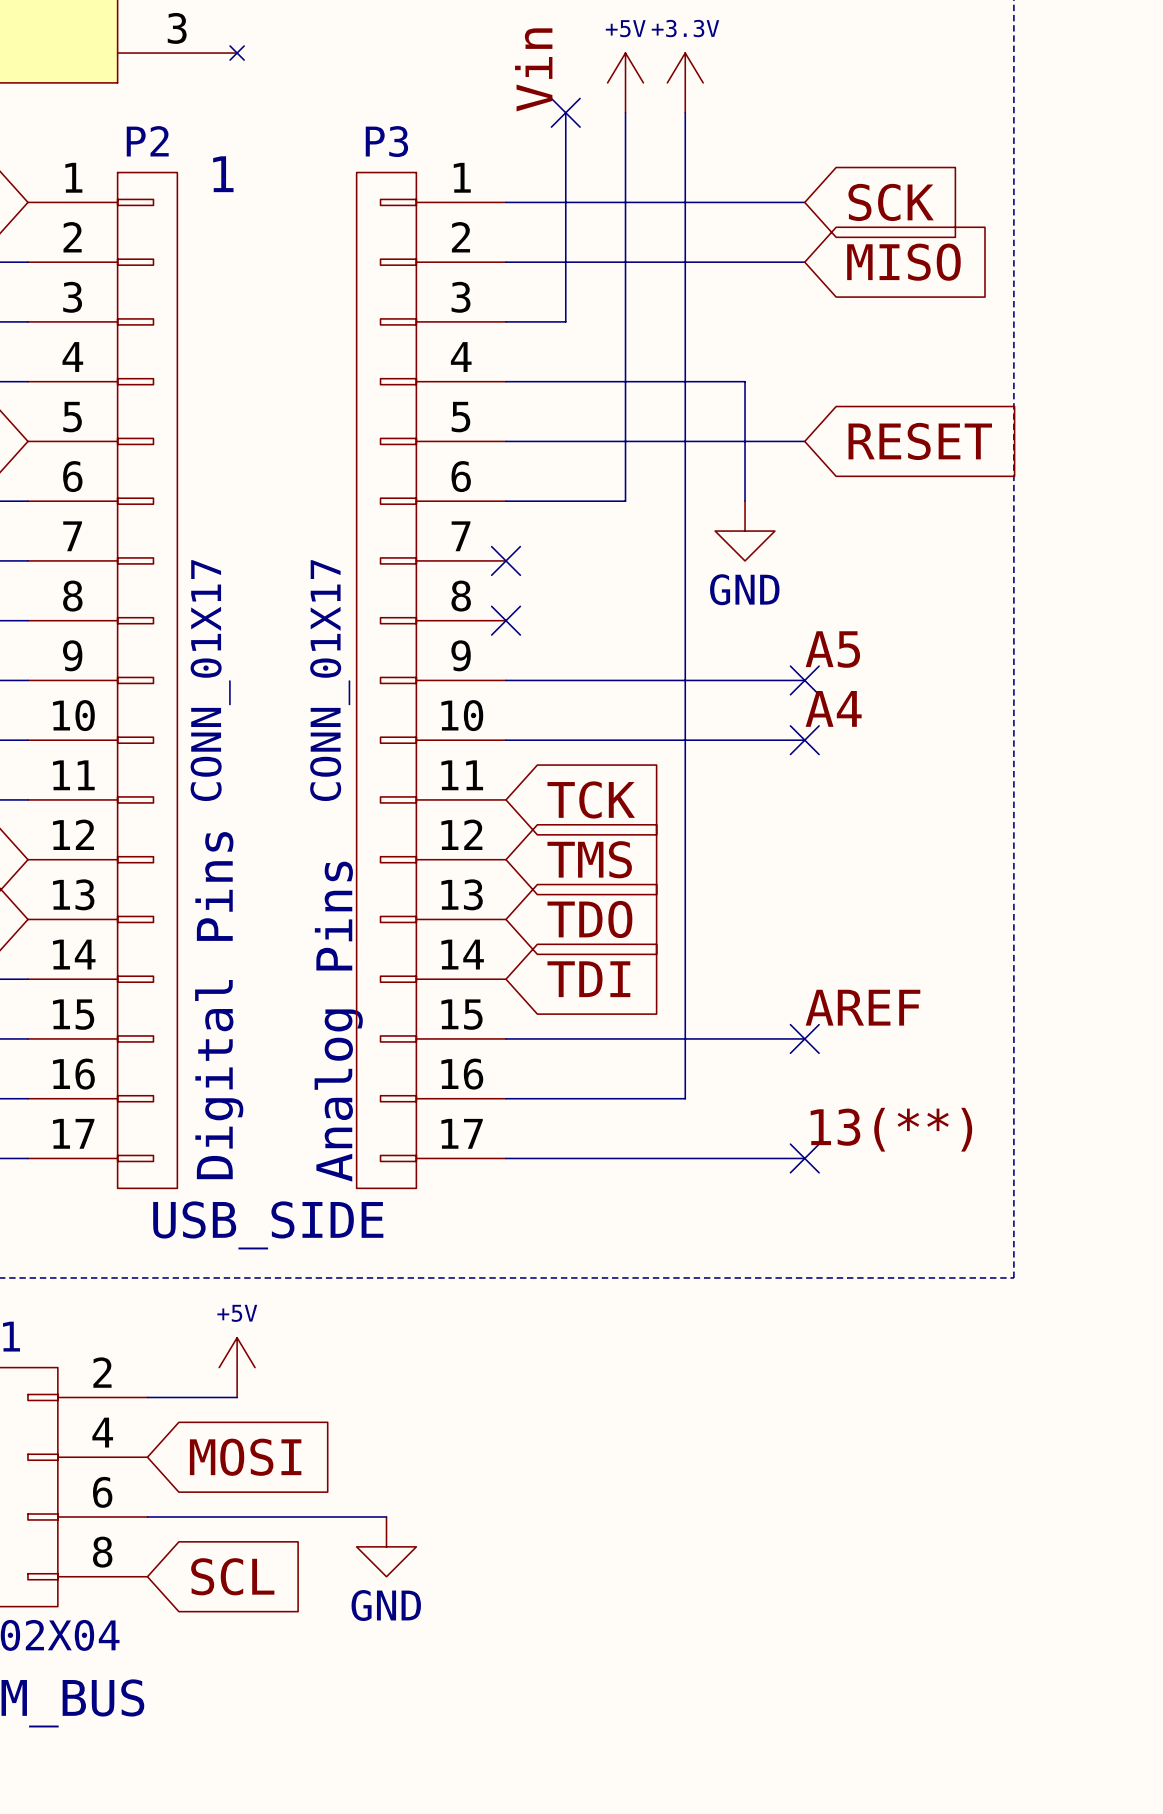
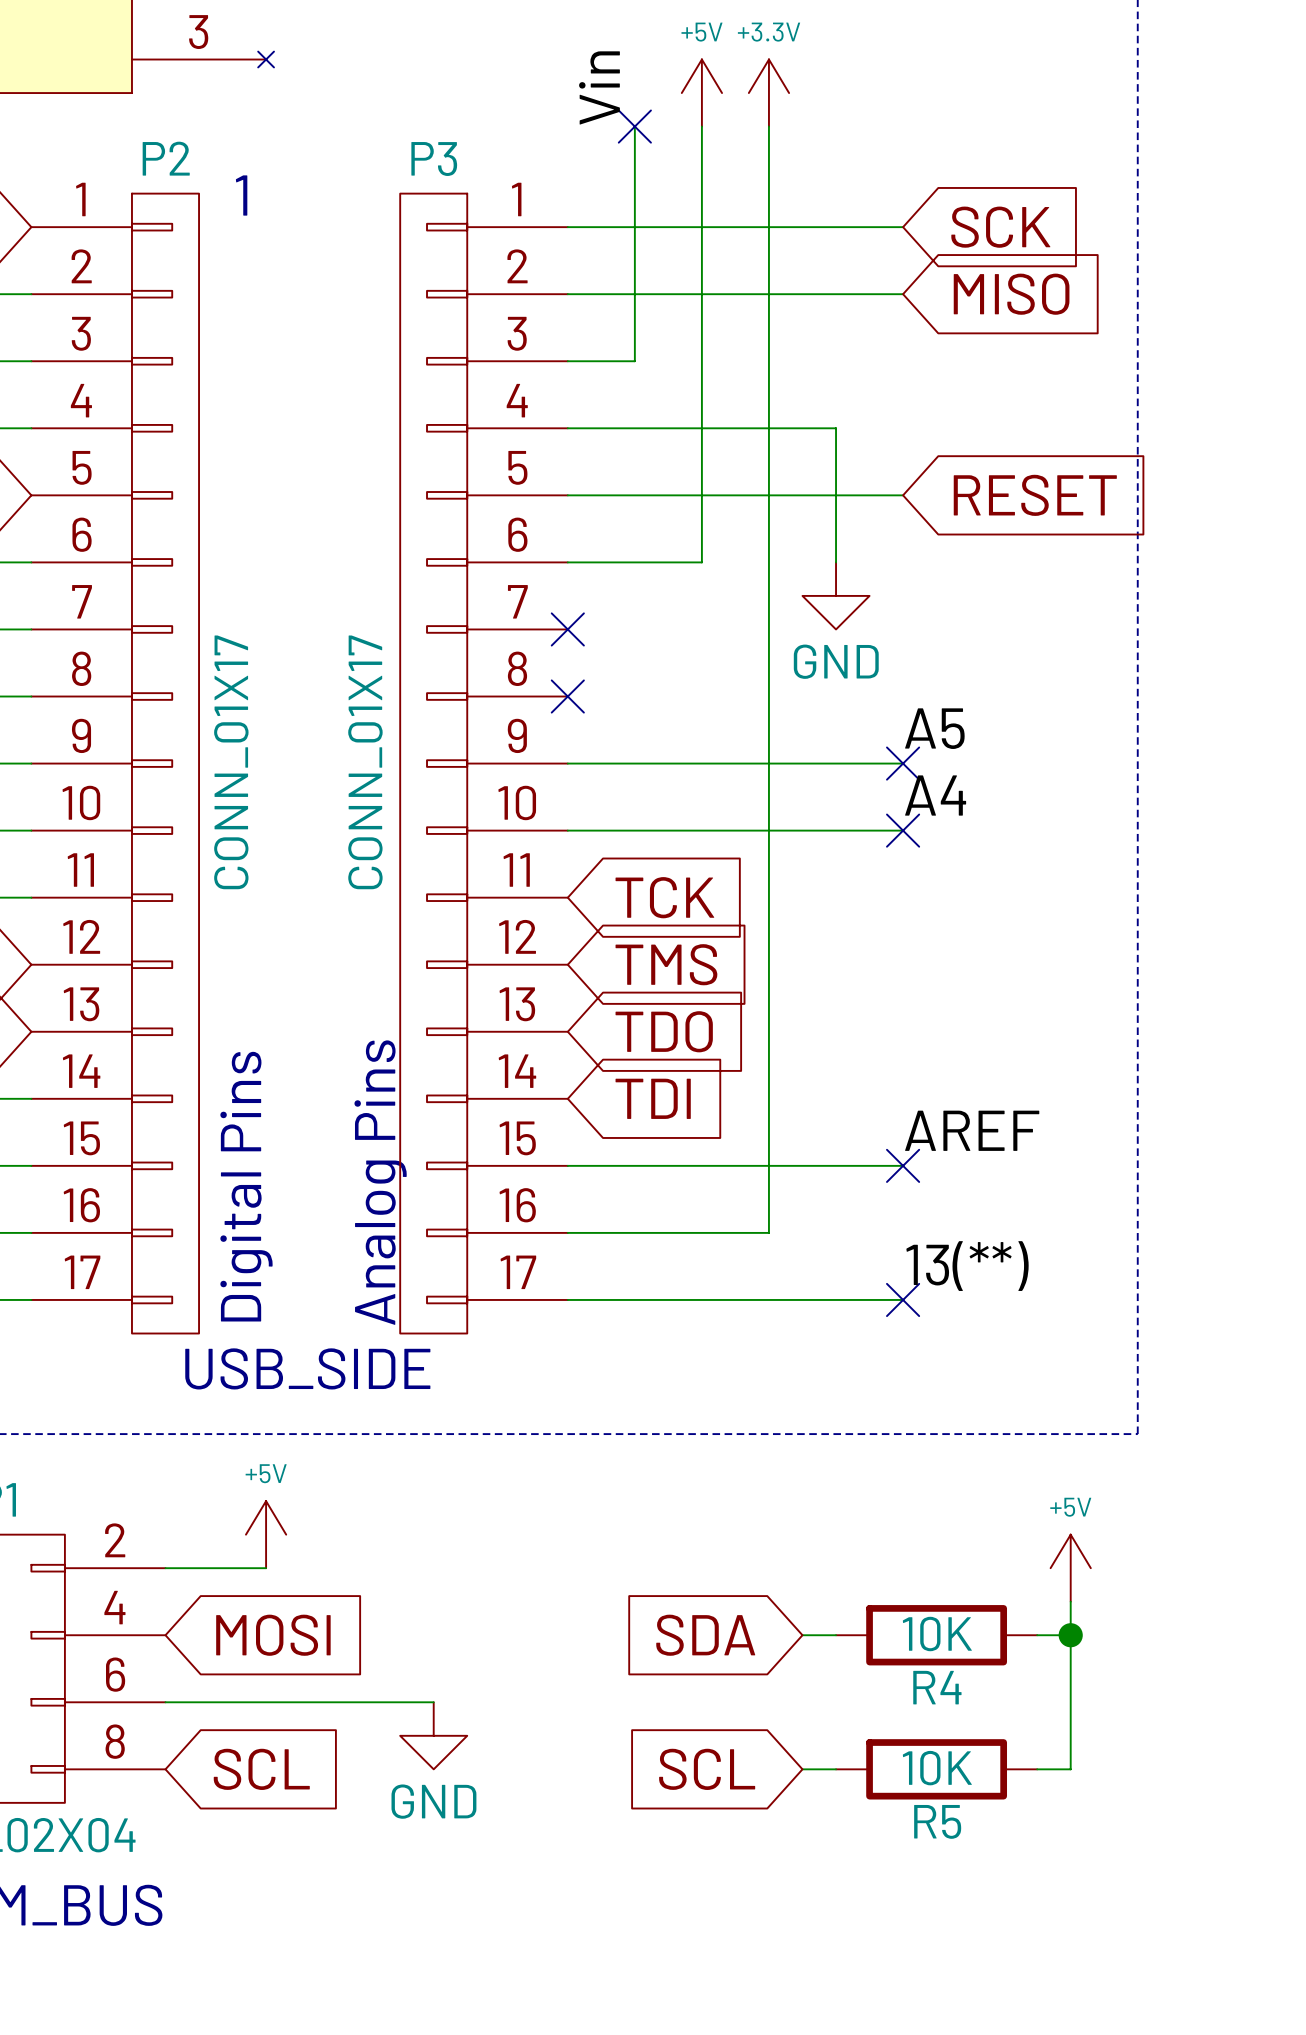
power symbol: none -> +5V (1070, 1568)
wire: none -> (1070, 1601) (1070, 1769) (1037, 1769)
global label: none -> SDA (705, 1635)
wire: none -> (802, 1635) (836, 1635)
R4: none -> 10K (936, 1635)
wire: none -> (1037, 1635) (1070, 1635)
junction: none -> (1070, 1635)
global label: none -> SCL (707, 1769)
wire: none -> (802, 1769) (836, 1769)
R5: none -> 10K (936, 1769)

